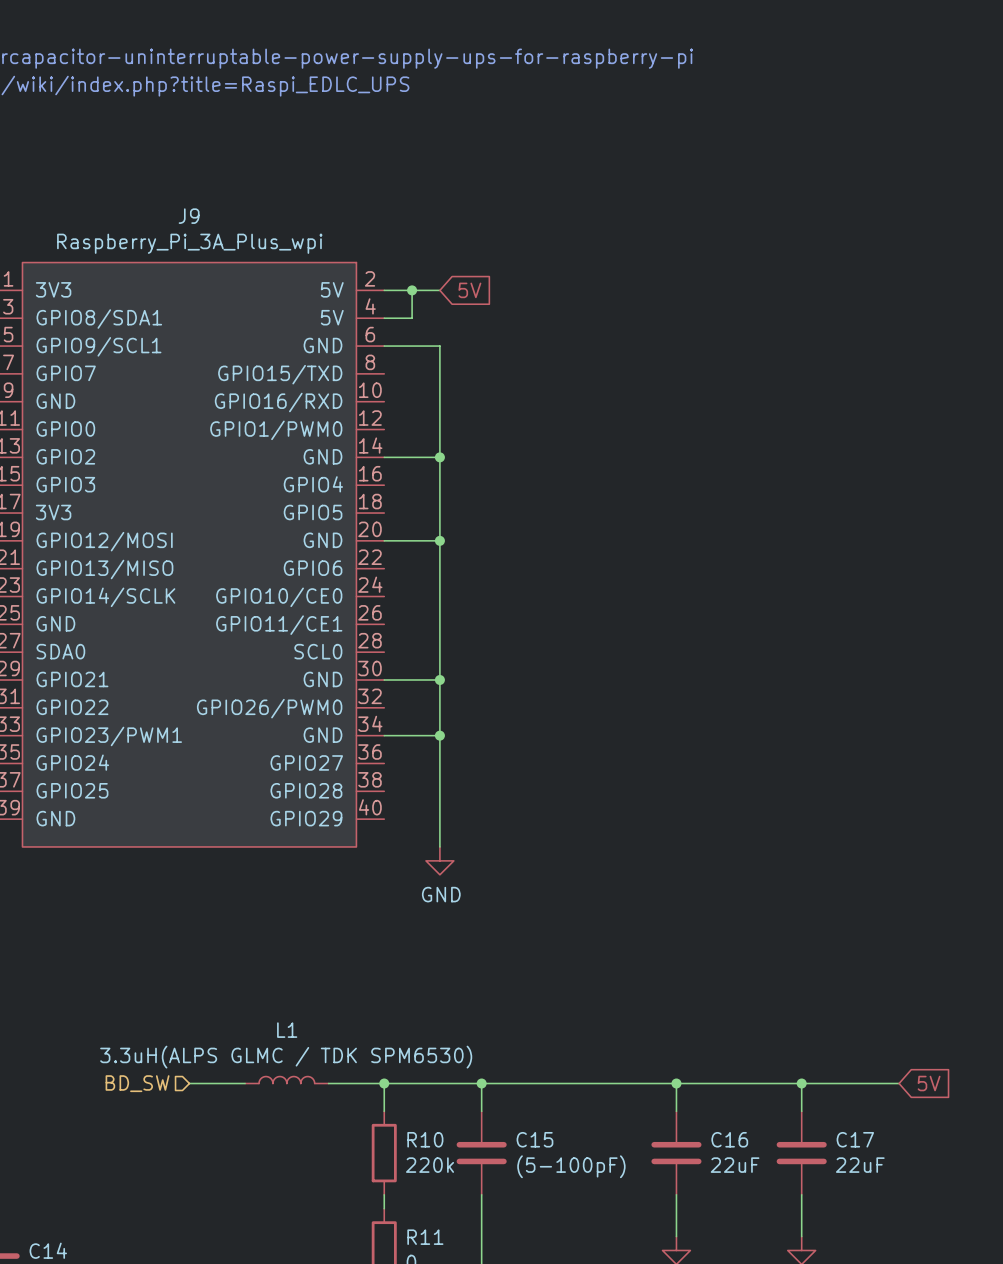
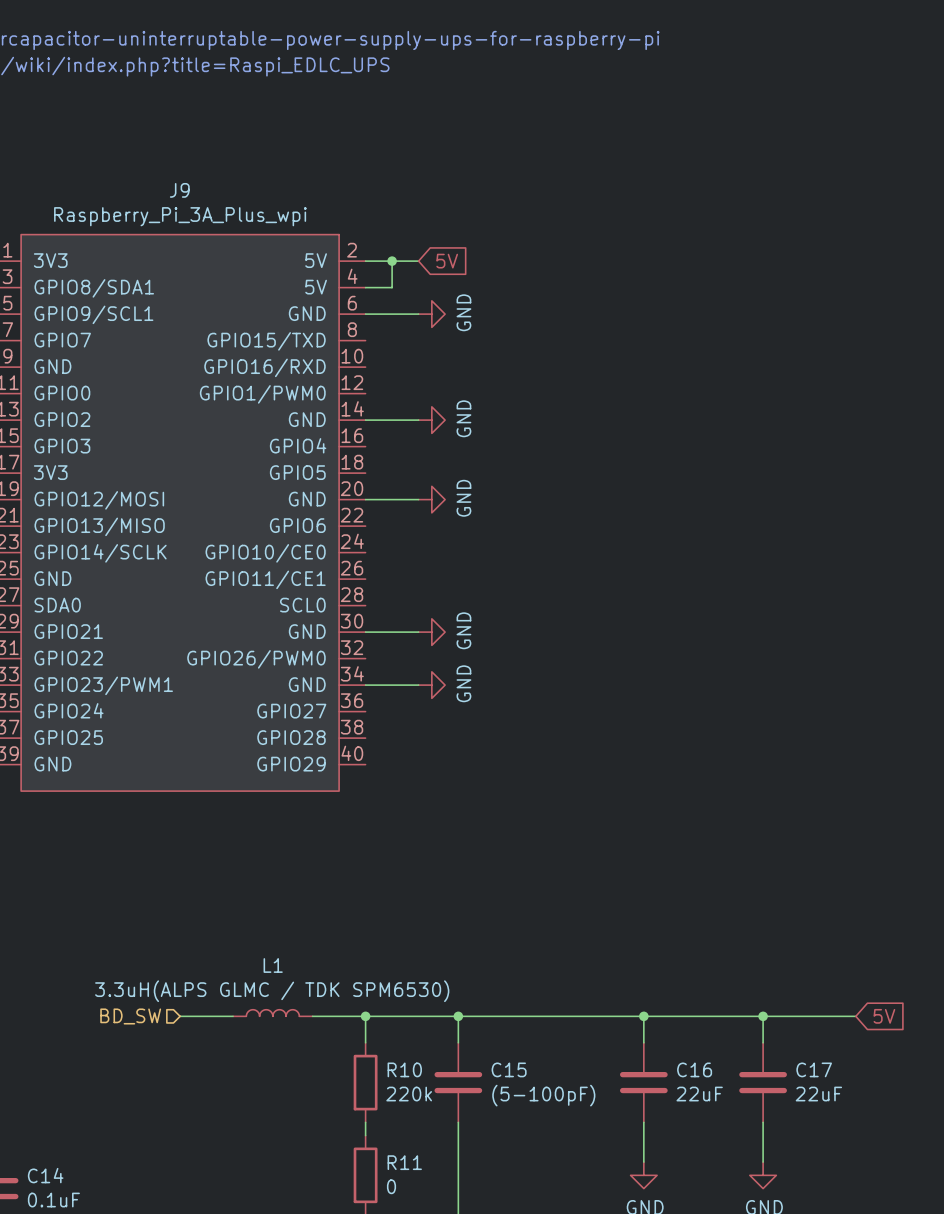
wire: (439, 346) (439, 846) -> none
power symbol: none -> GND (431, 314)
junction: (439, 457) -> none
power symbol: none -> GND (431, 420)
junction: (439, 540) -> none
power symbol: none -> GND (431, 499)
junction: (439, 679) -> none
power symbol: none -> GND (431, 632)
junction: (439, 735) -> none
power symbol: none -> GND (431, 685)
power symbol: GND (439, 860) -> none

